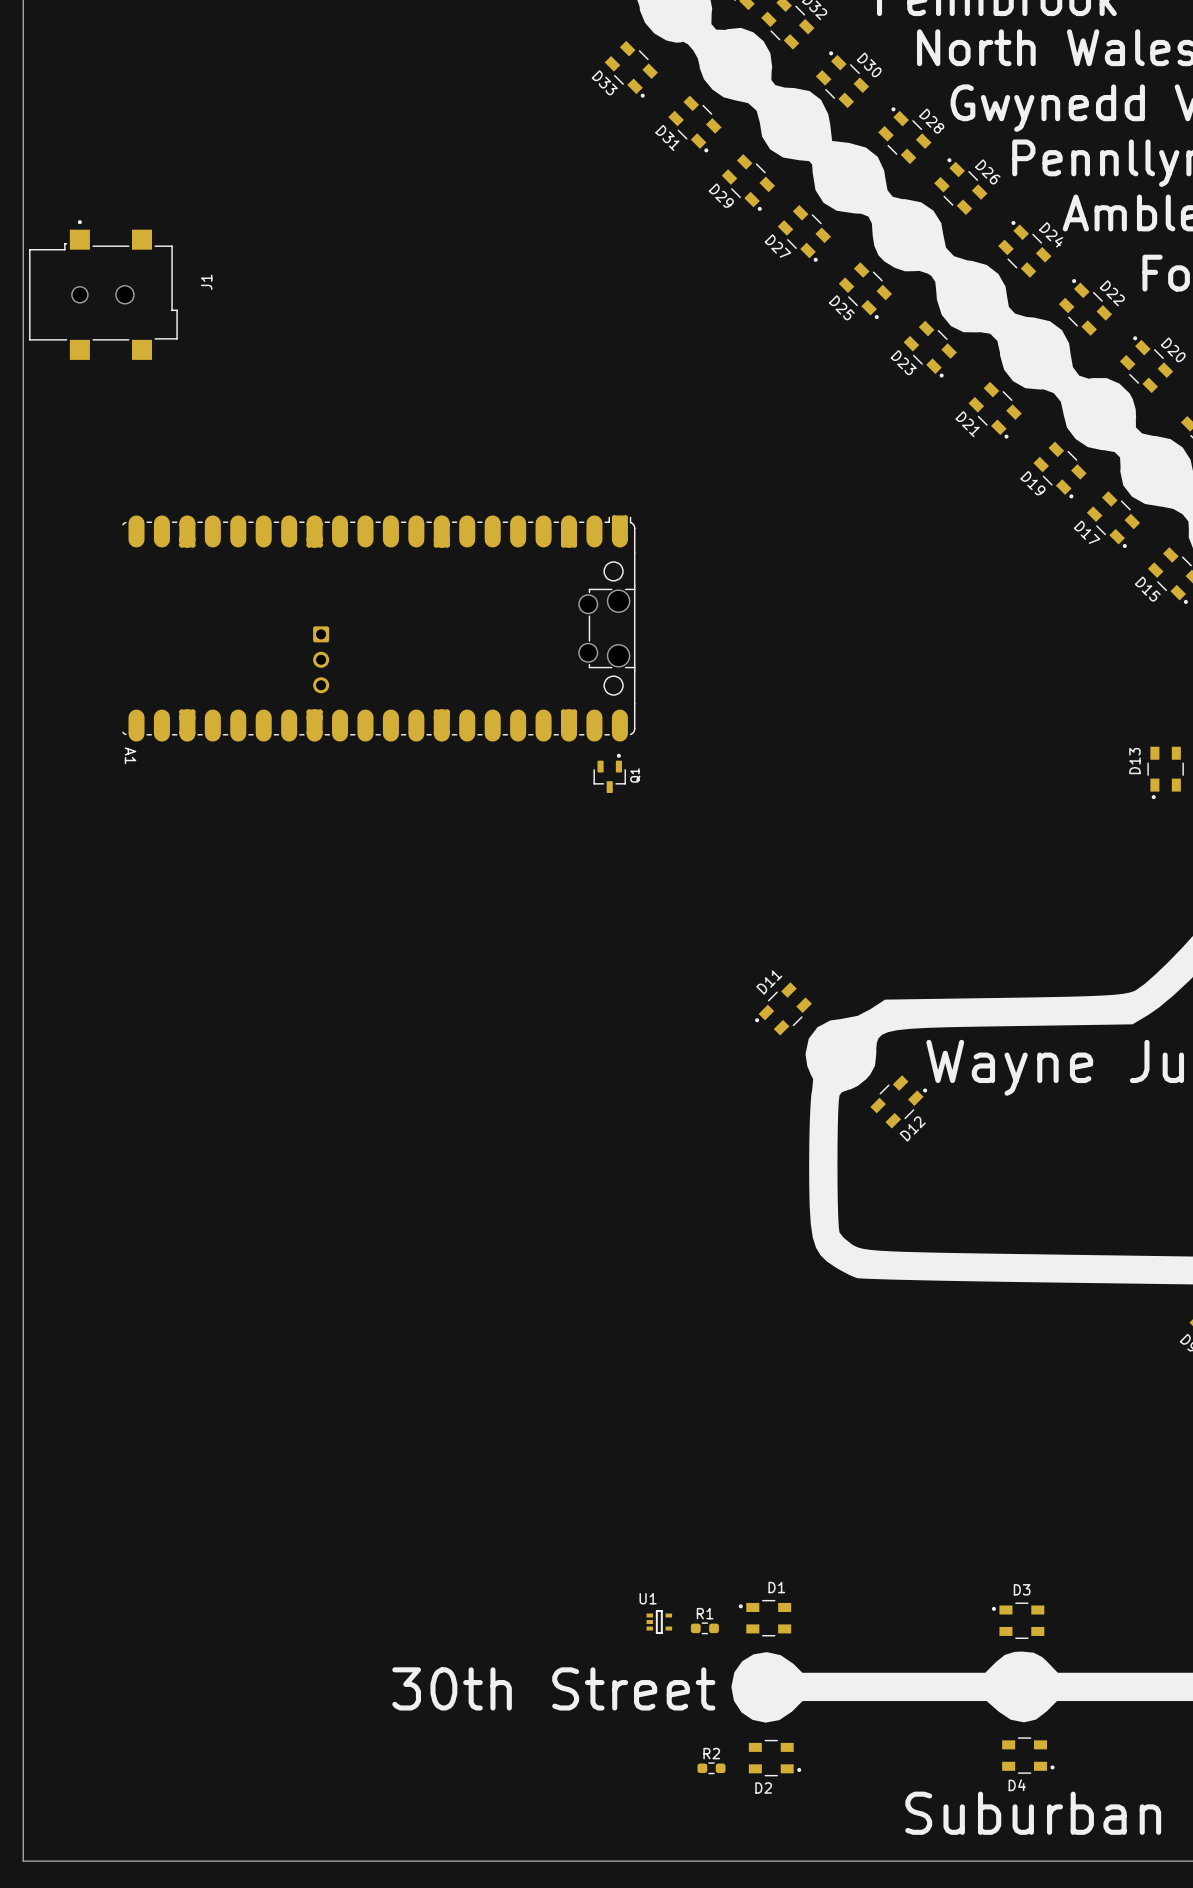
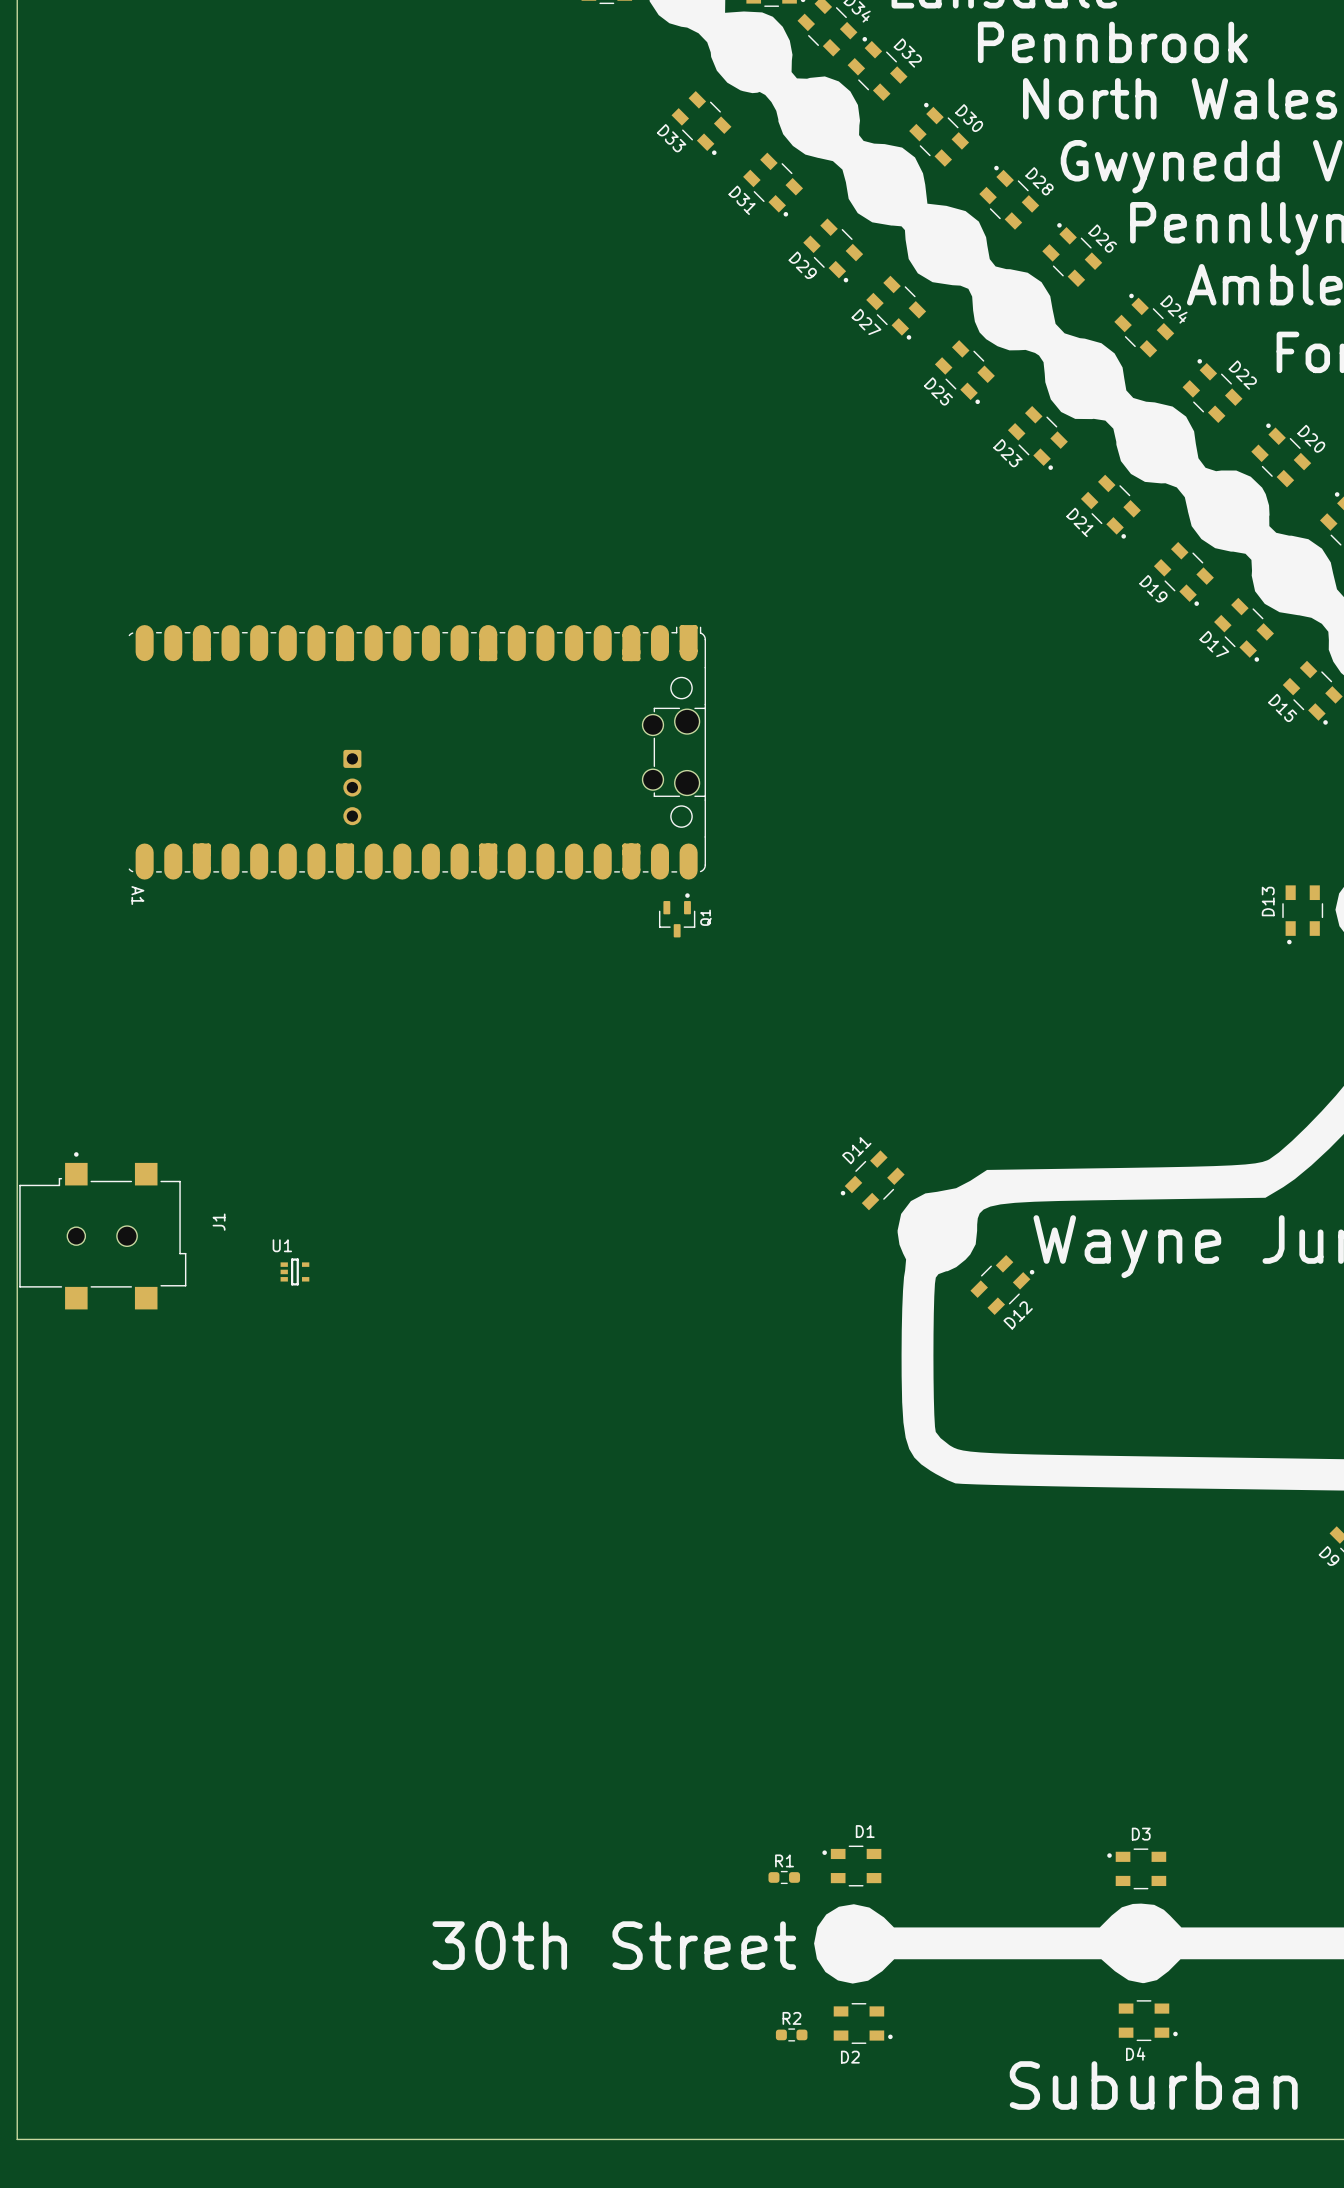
J1 position: (103, 290) -> (102, 1230)
U1 position: (659, 1622) -> (294, 1271)

